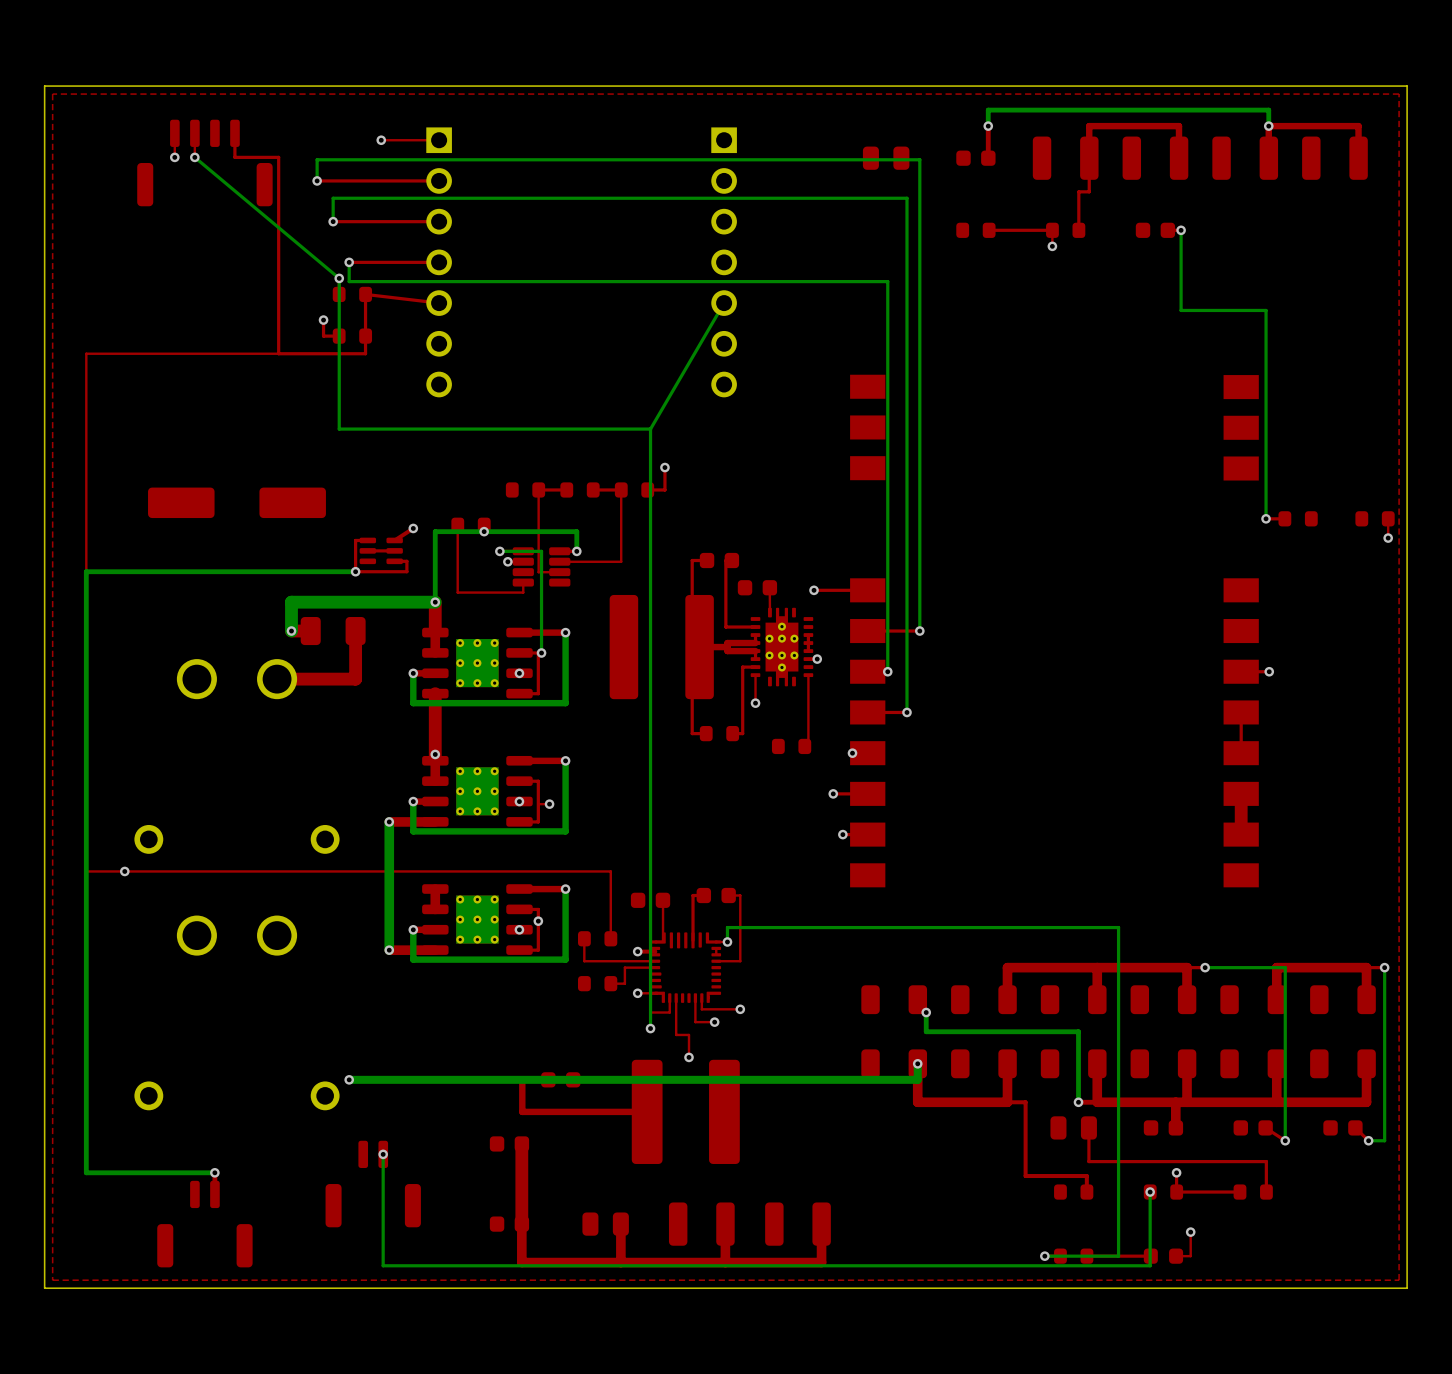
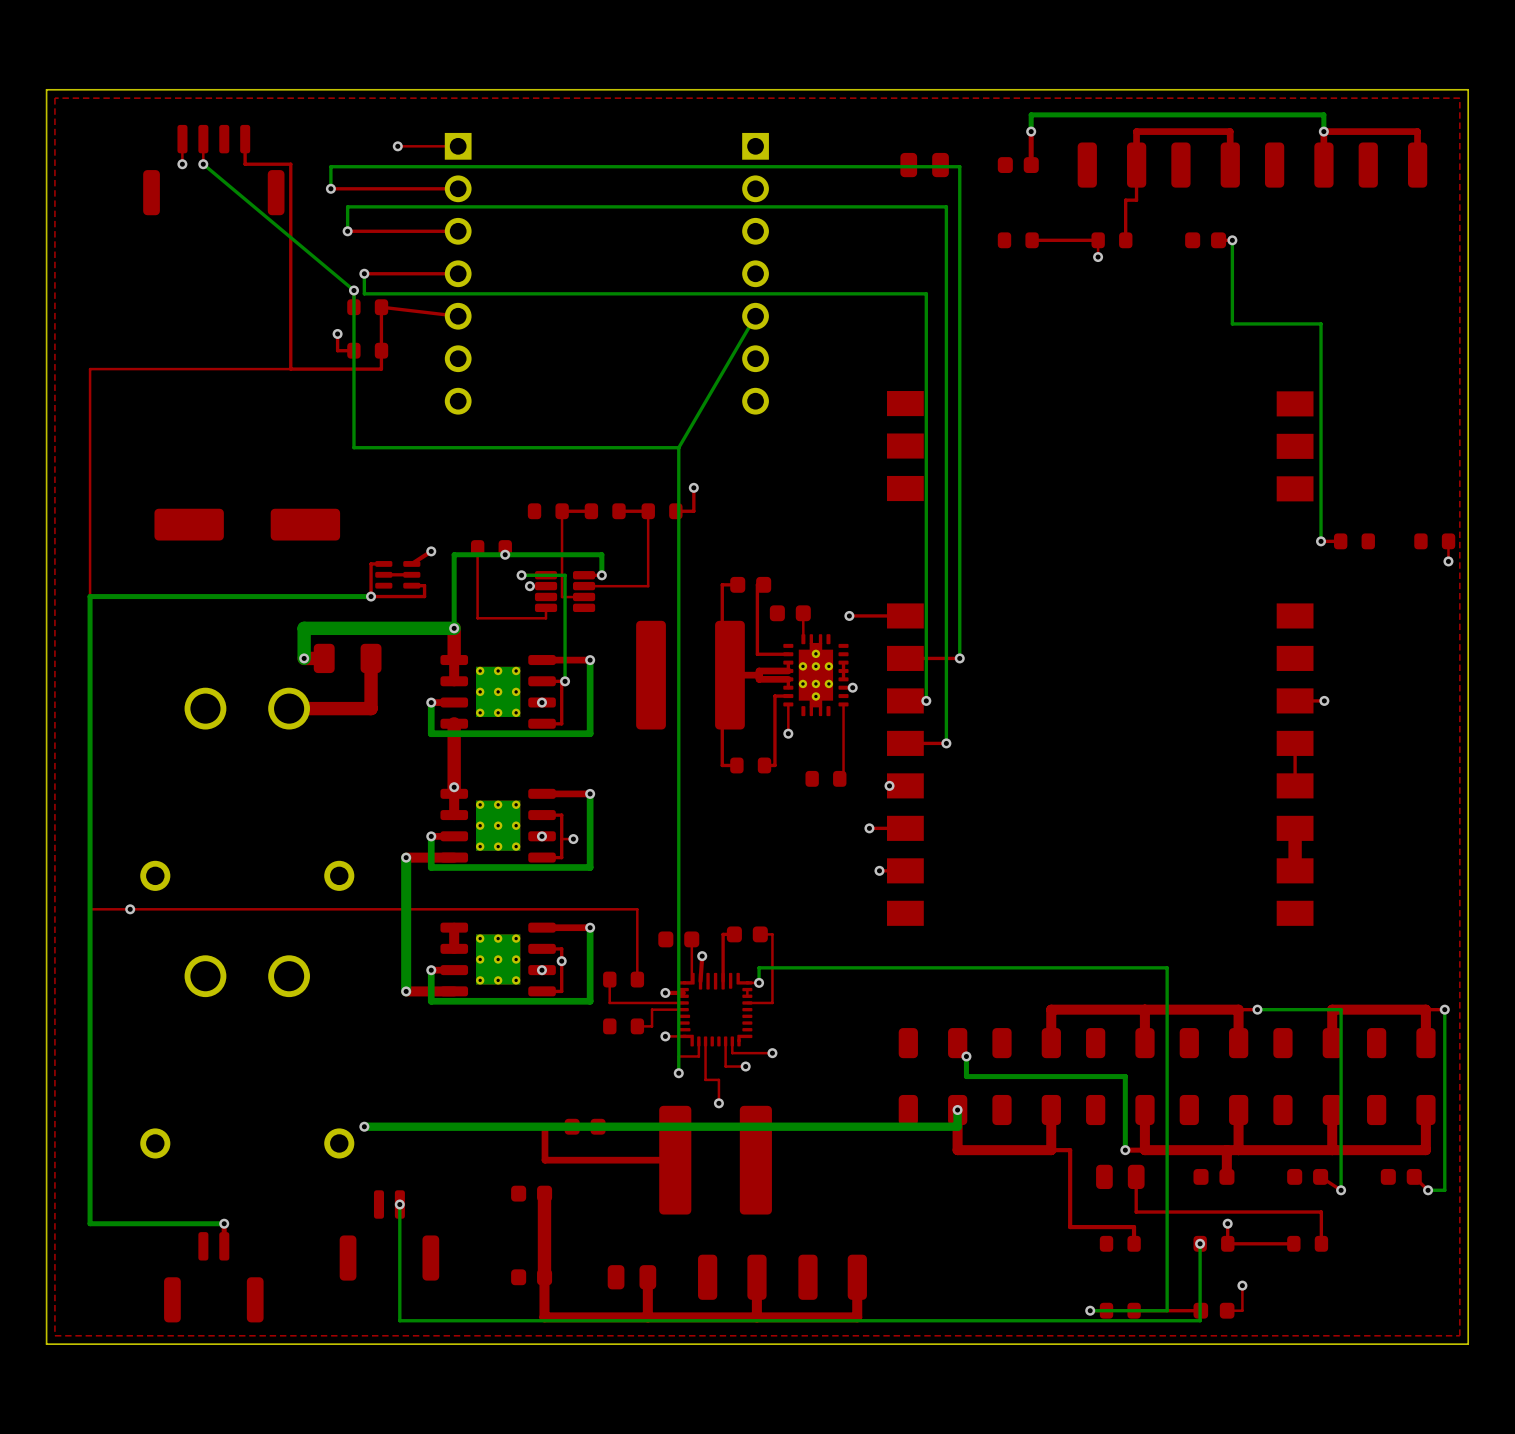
top track: none -> (702, 956) (700, 981)
via: none -> (702, 956)

